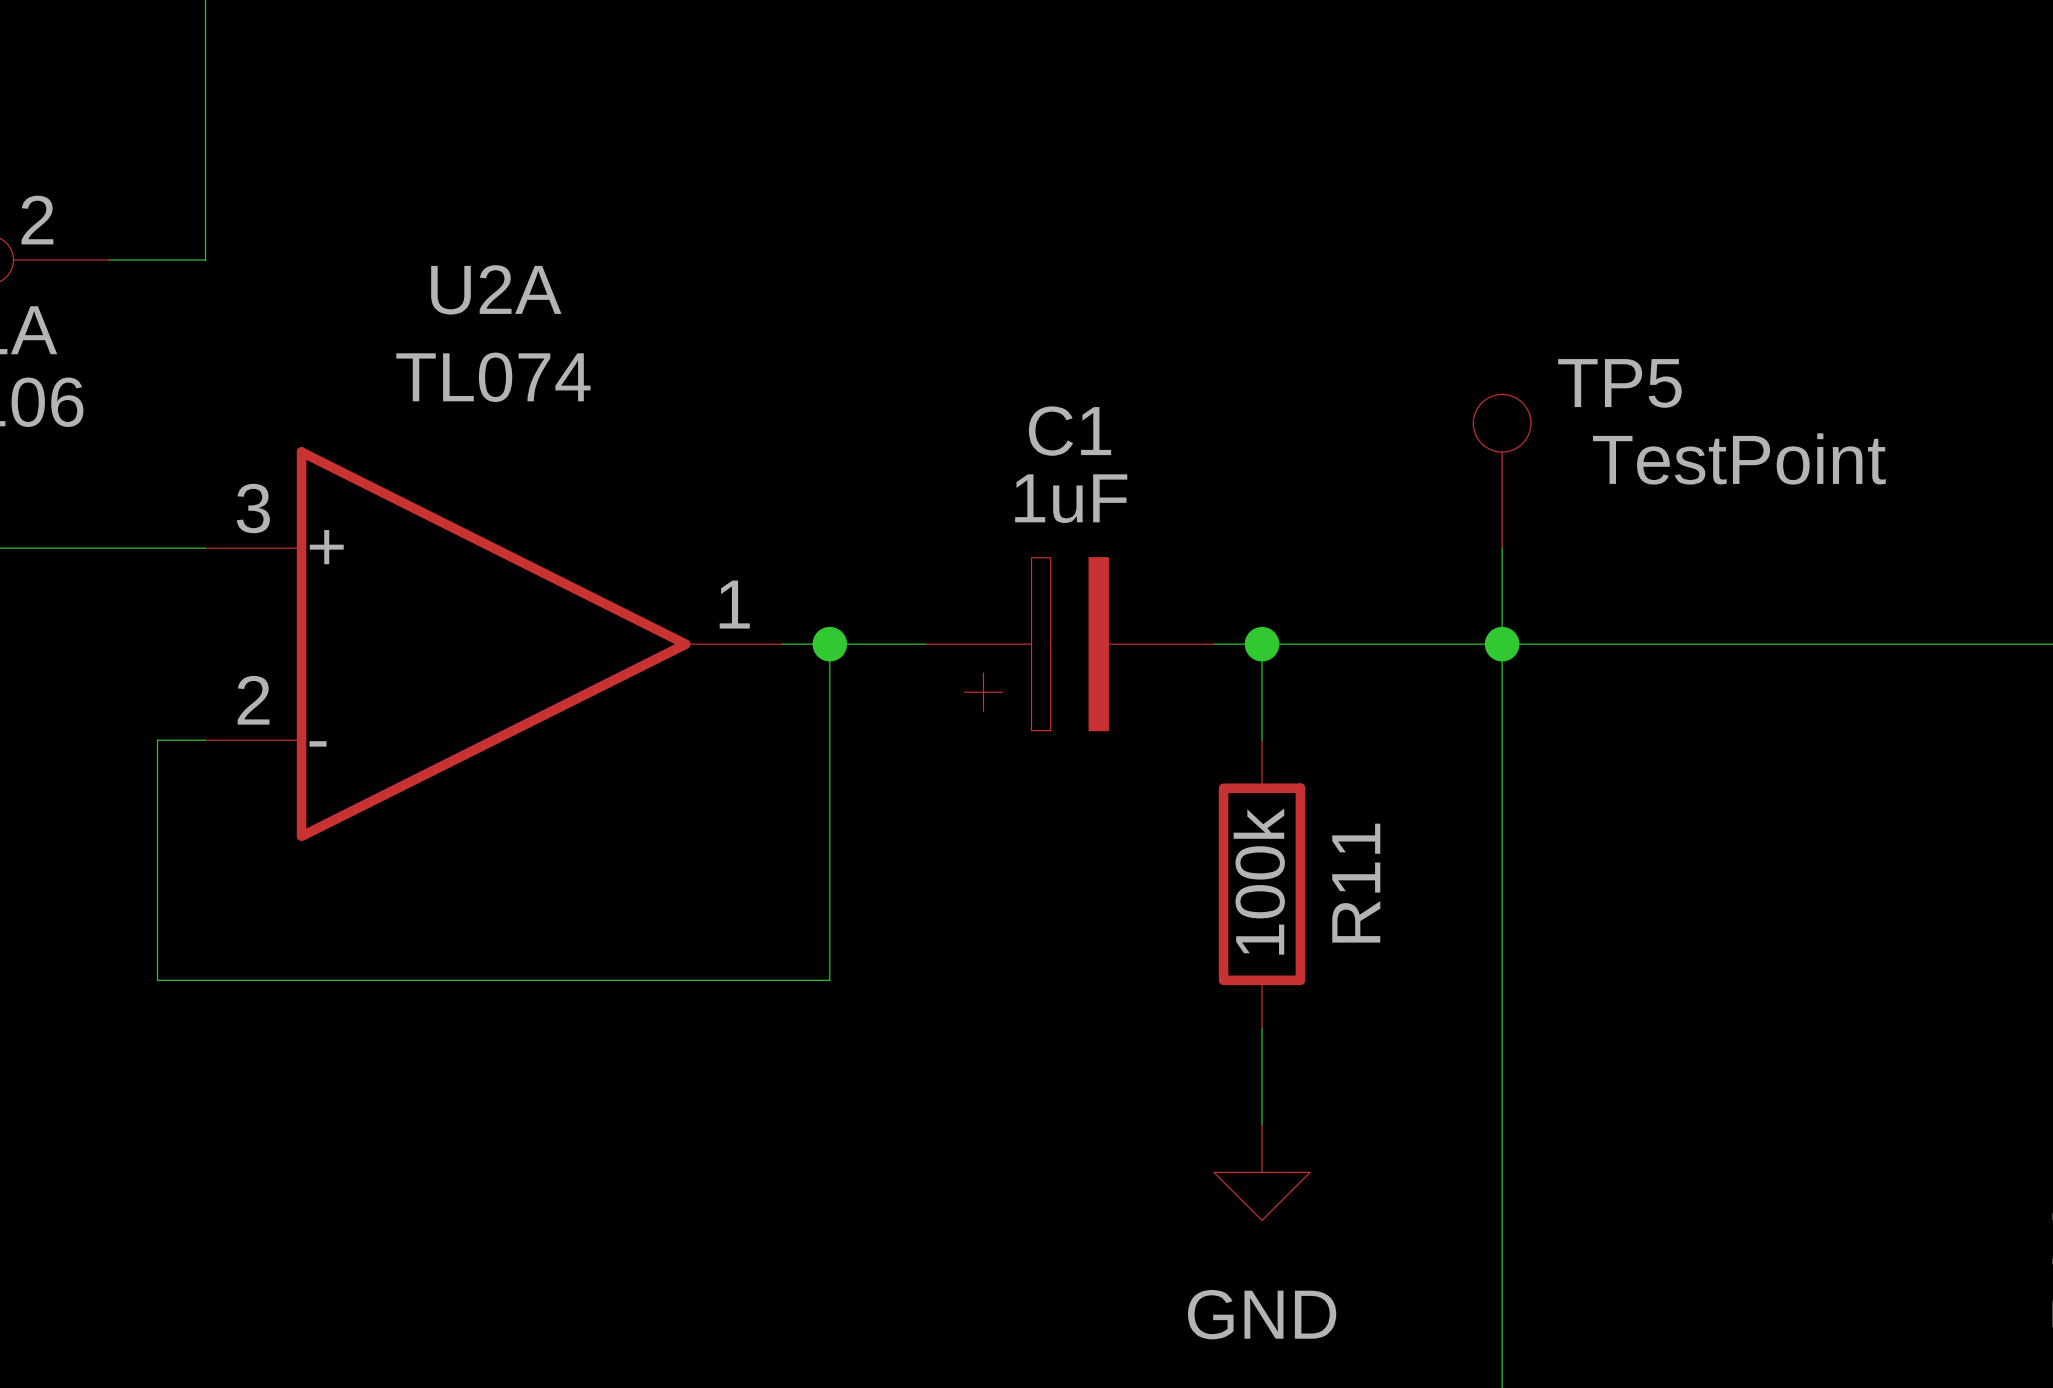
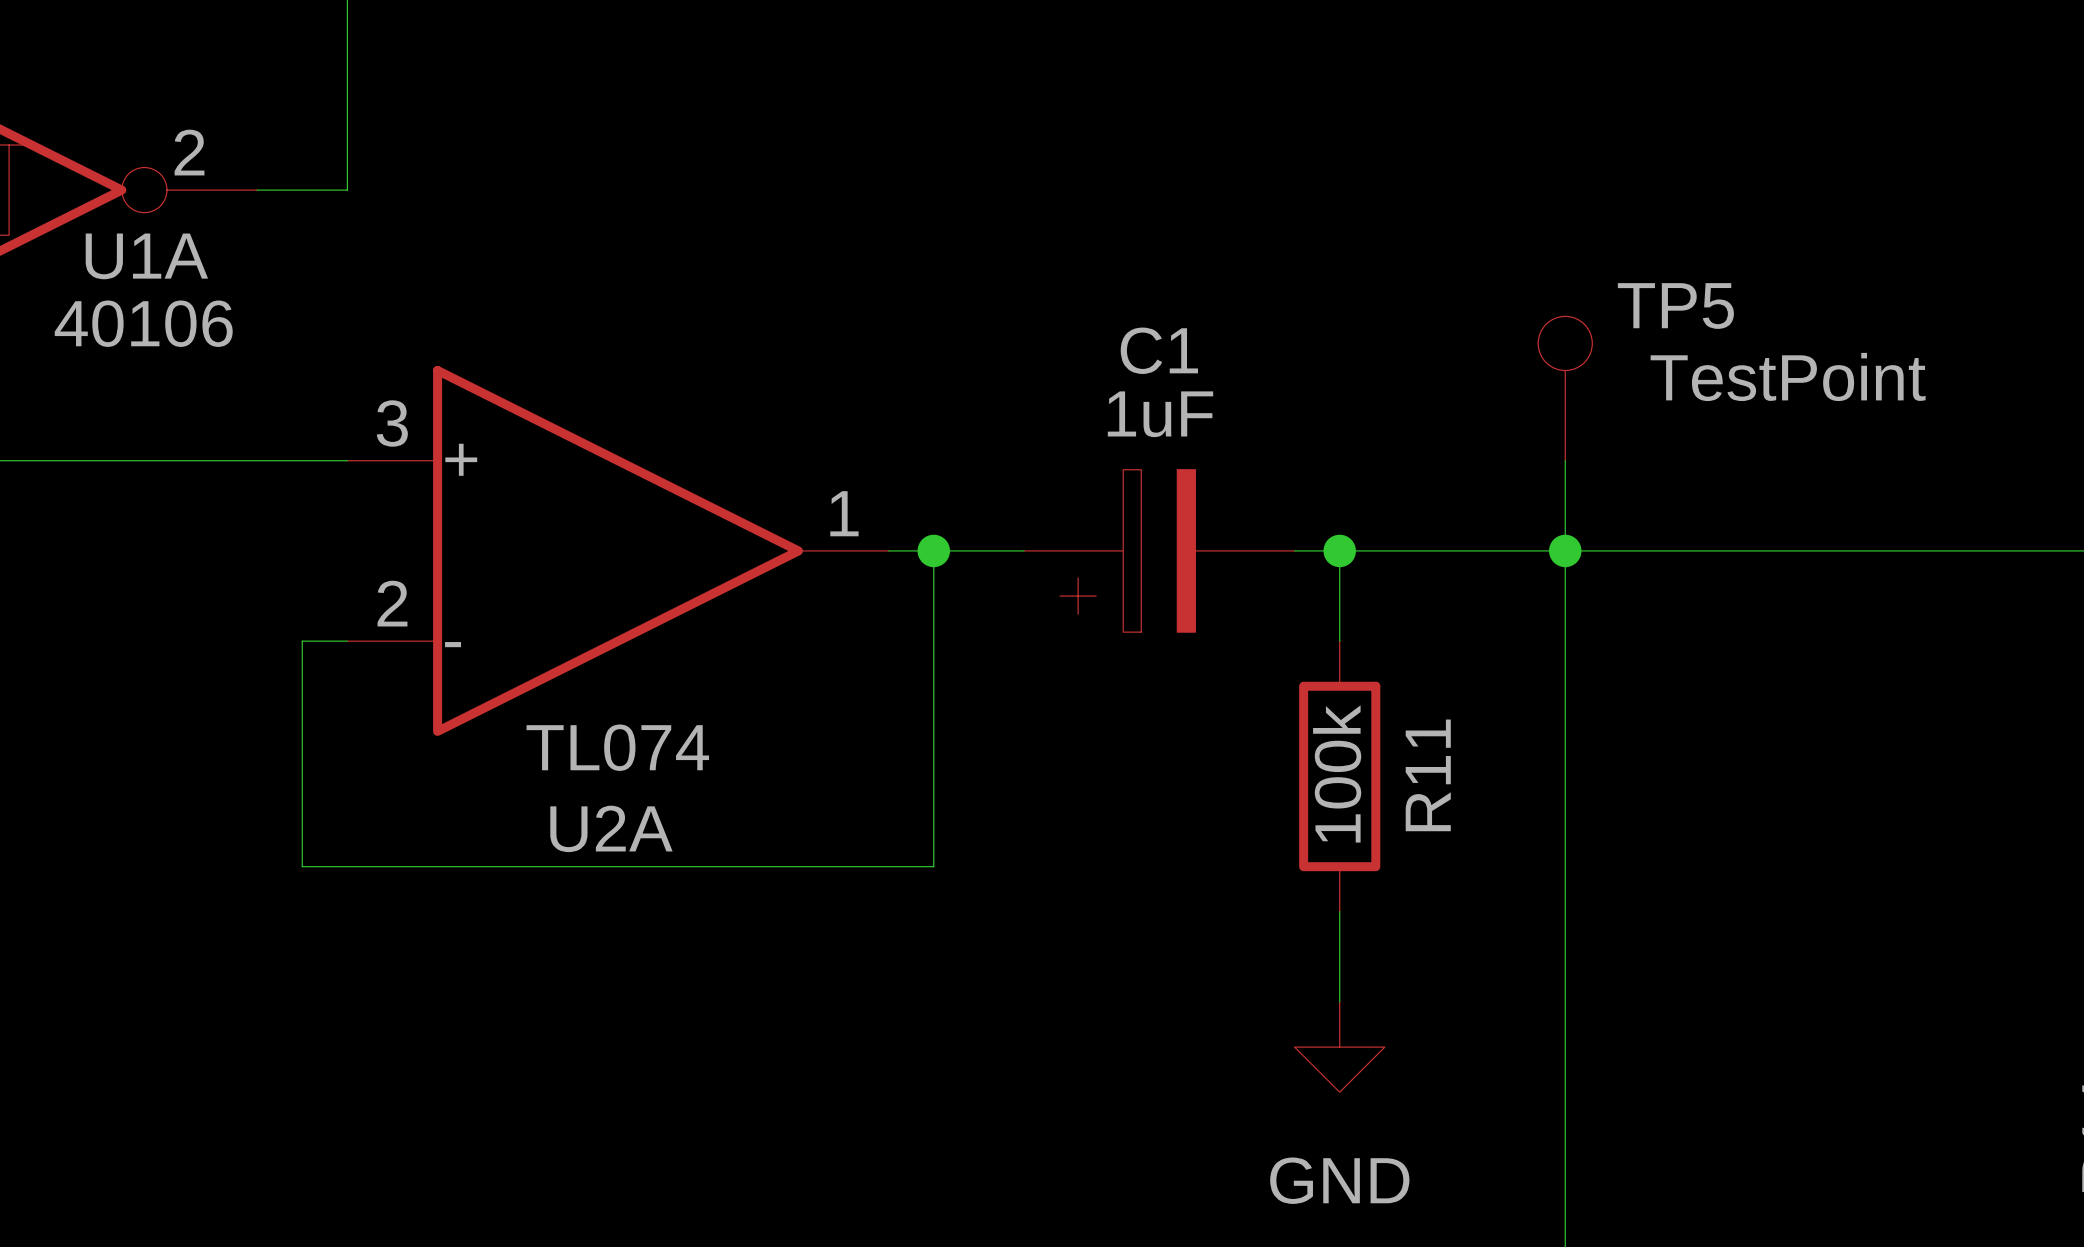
U2A name position: U2A (496, 289) -> U2A (611, 828)
U2A value position: TL074 (493, 377) -> TL074 (617, 747)

